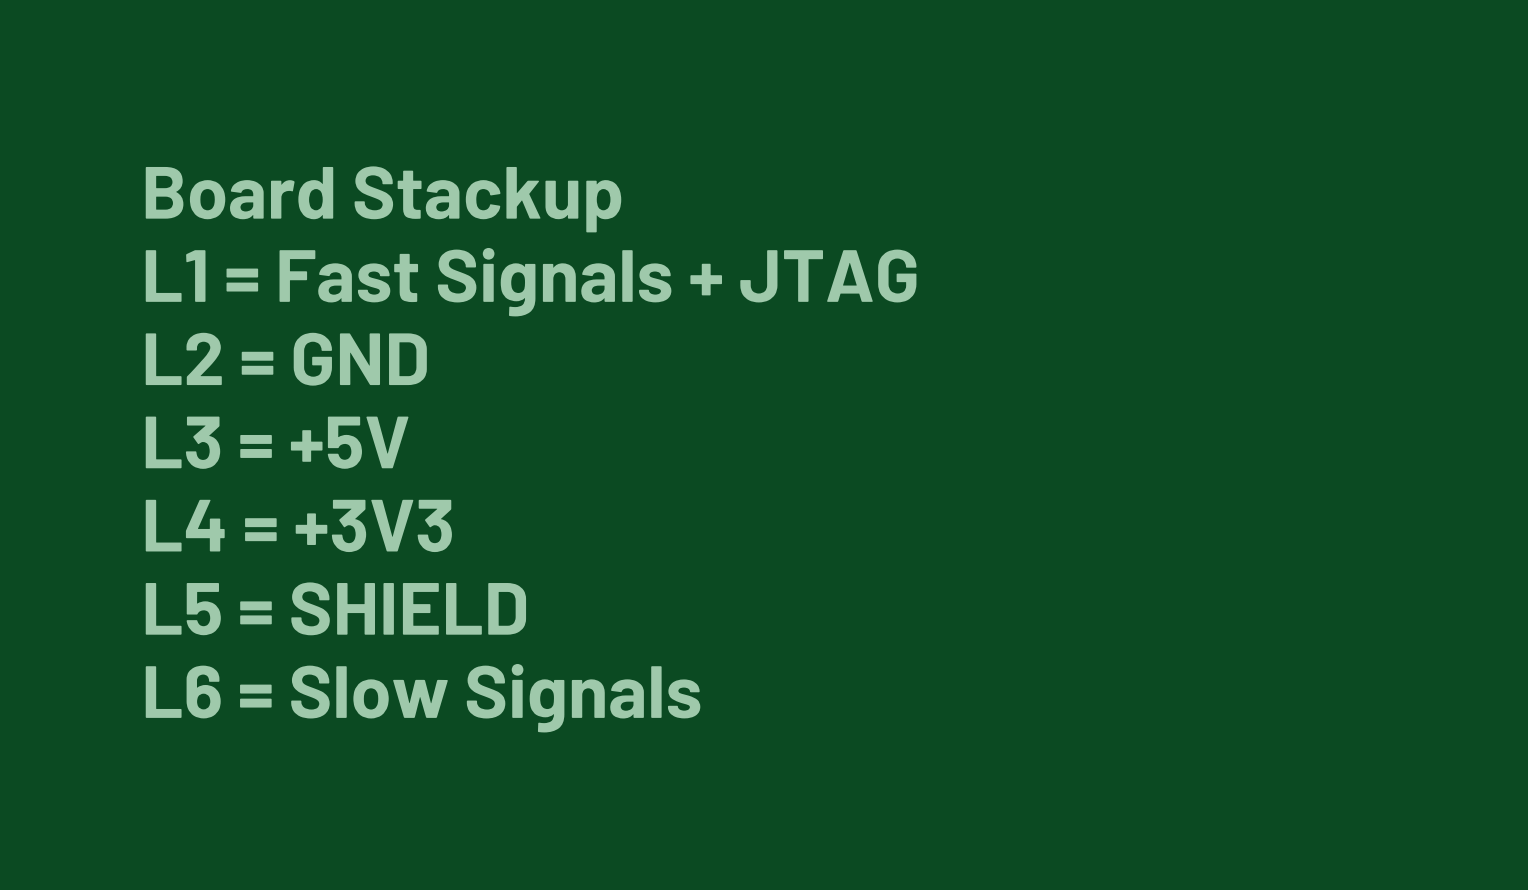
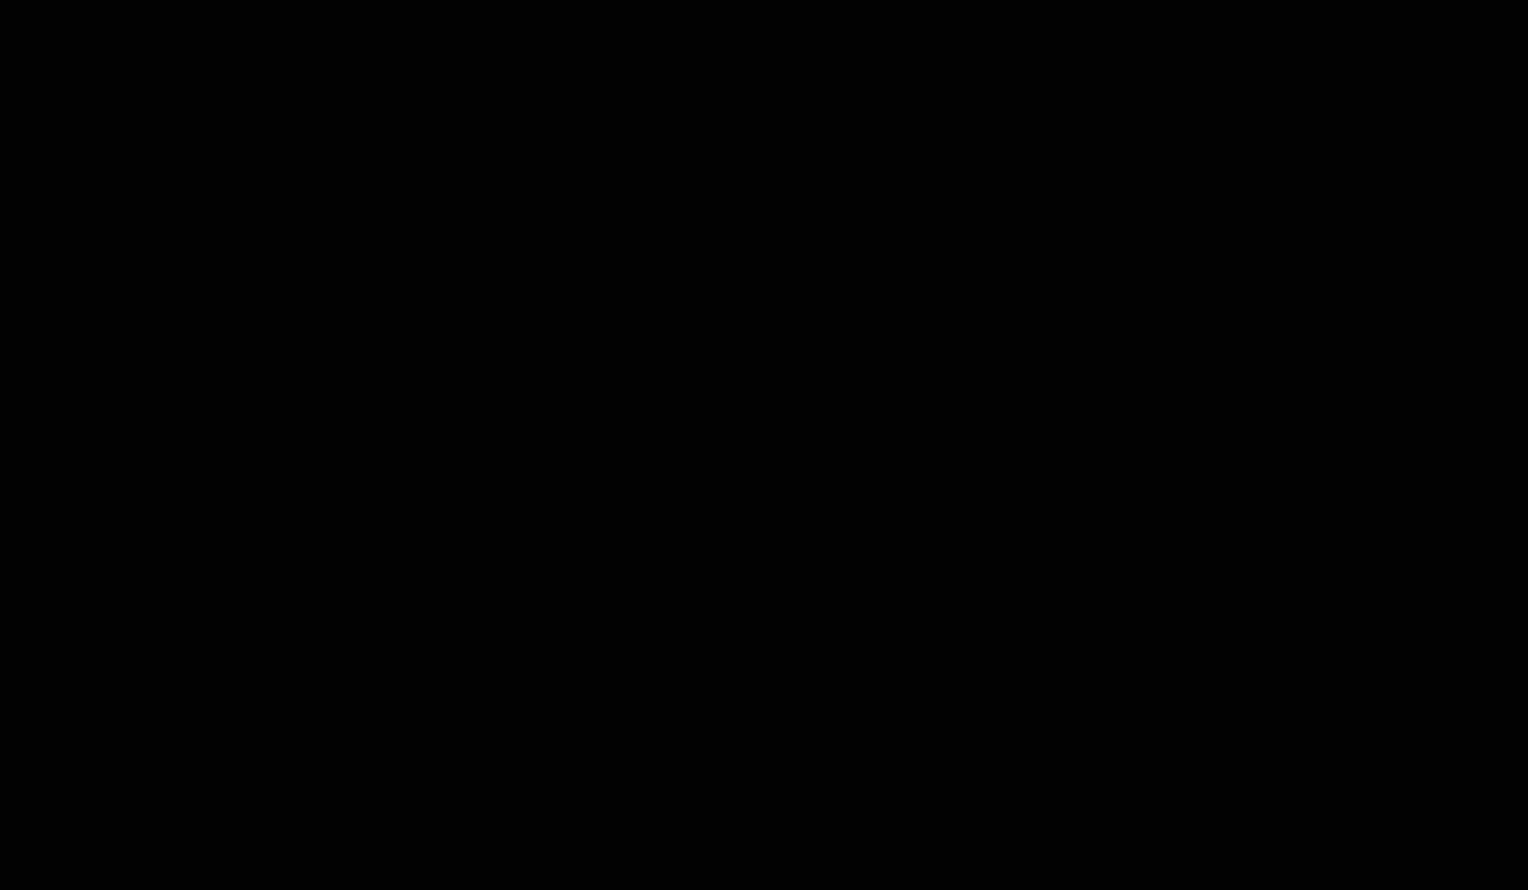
text: Board Stackup (383, 199) -> none
text: L1 = Fast Signals + JTAG (531, 282) -> none
text: L2 = GND (286, 359) -> none
text: L3 = +5V (277, 442) -> none
text: L4 = +3V3 (298, 525) -> none
text: L5 = SHIELD (335, 608) -> none
text: L6 = Slow Signals (423, 698) -> none

